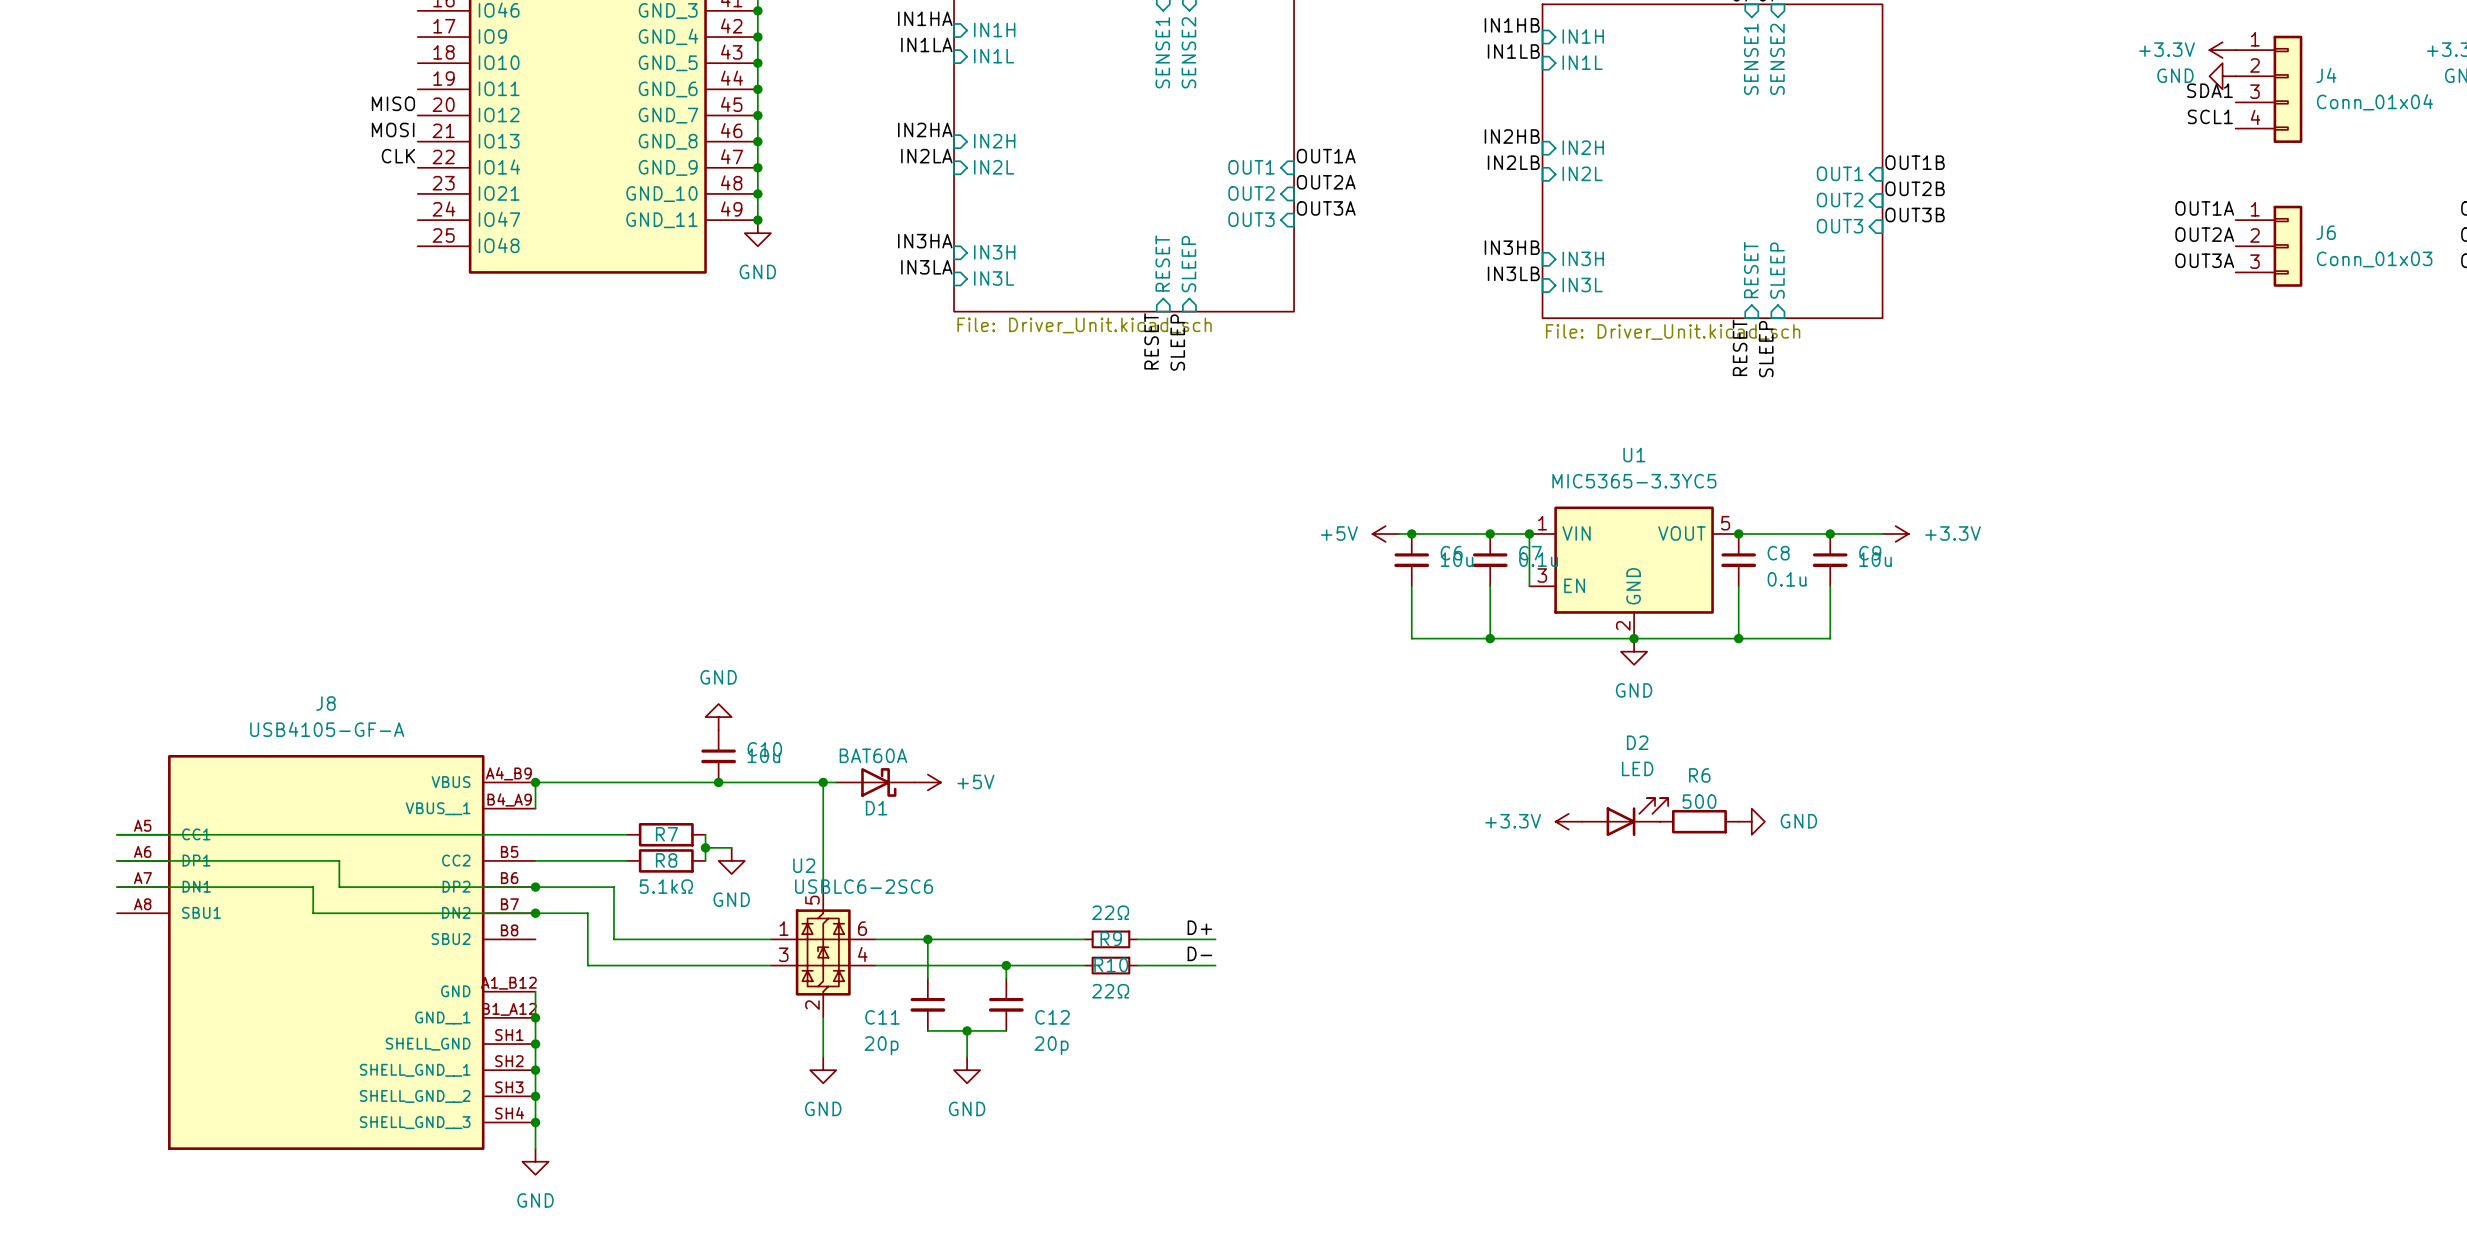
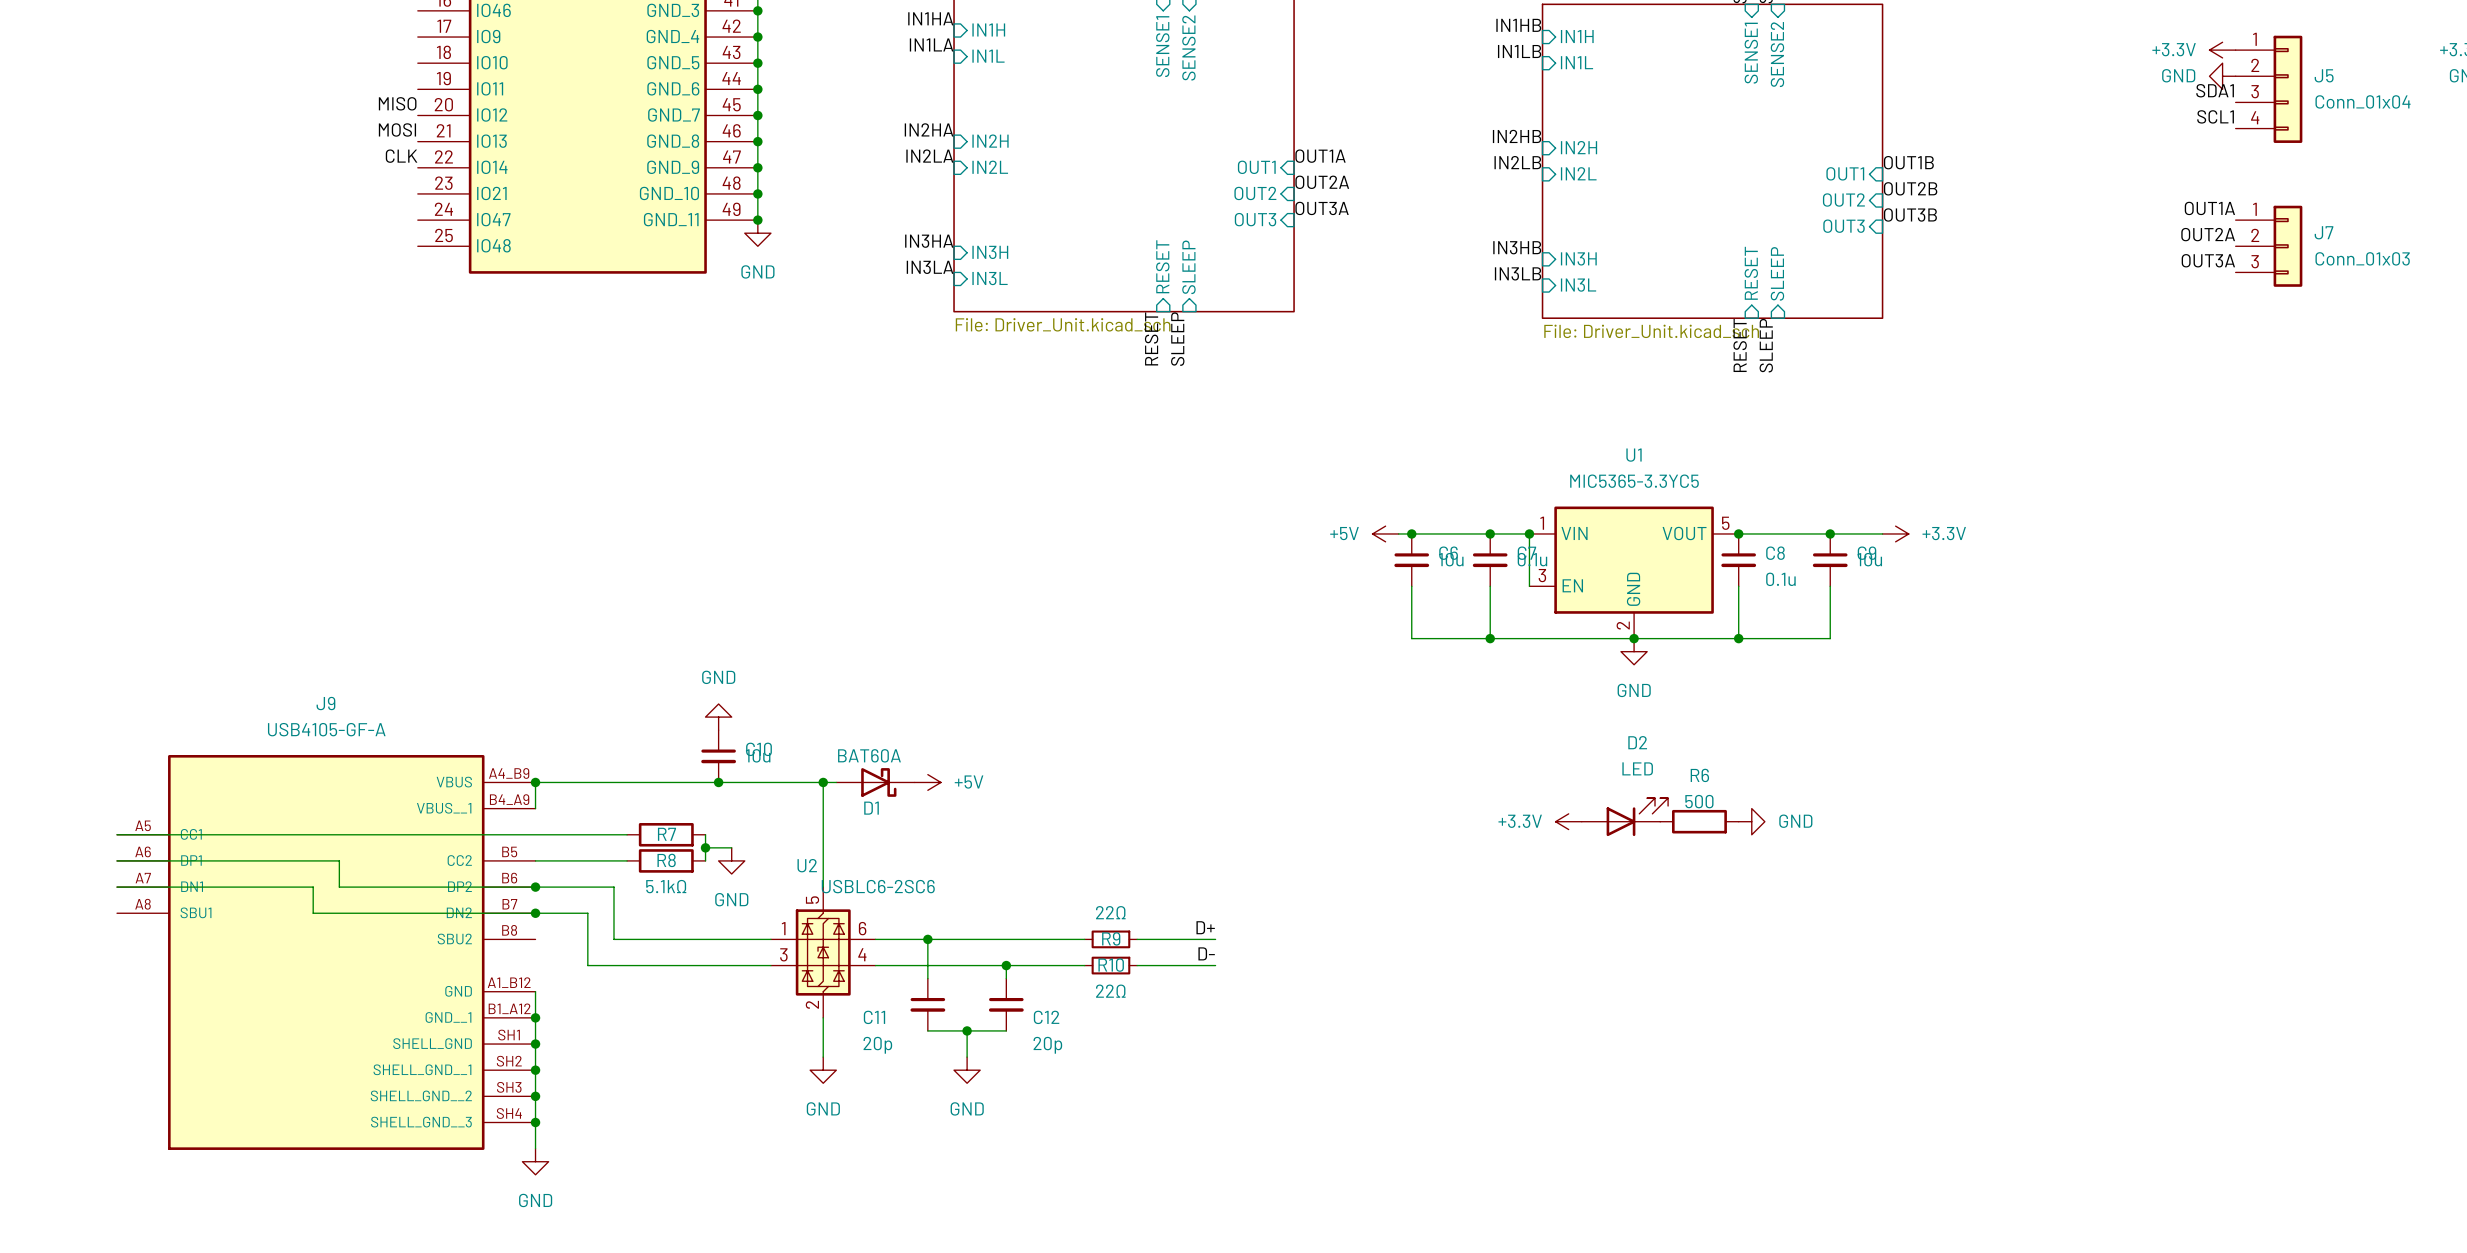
J4 name: J4 (2326, 75) -> J5 (2324, 75)
J6 name: J6 (2326, 232) -> J7 (2324, 232)
J8 name: J8 (325, 703) -> J9 (325, 703)

